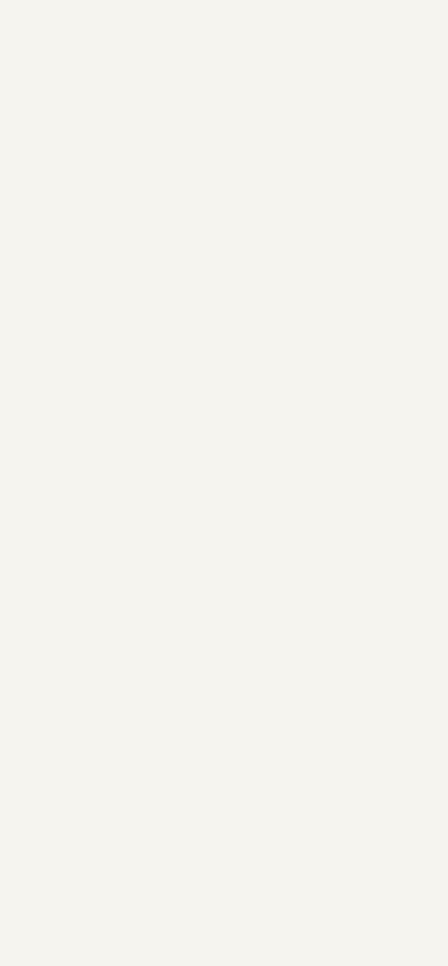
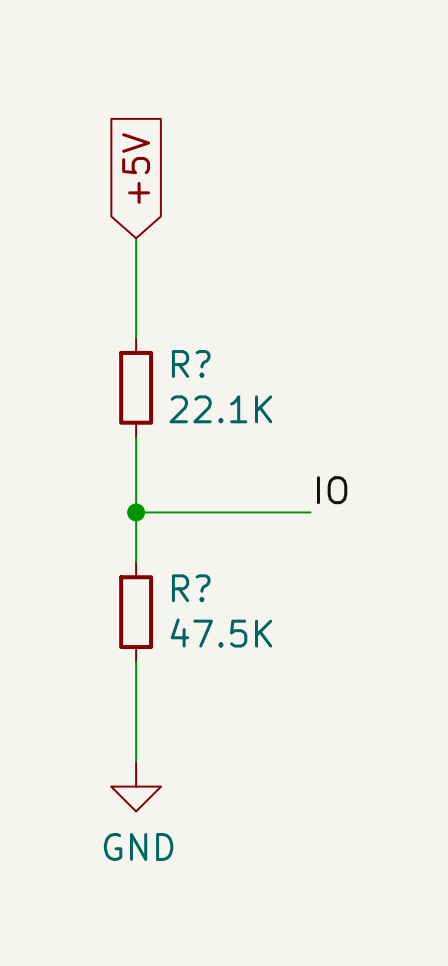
global label: none -> +5V (136, 168)
wire: none -> (136, 238) (136, 337)
R?: none -> 22.1K (136, 387)
wire: none -> (136, 437) (136, 562)
label: none -> IO (332, 490)
wire: none -> (136, 512) (310, 512)
junction: none -> (136, 512)
R?: none -> 47.5K (136, 612)
wire: none -> (136, 661) (136, 761)
power symbol: none -> GND (136, 786)

